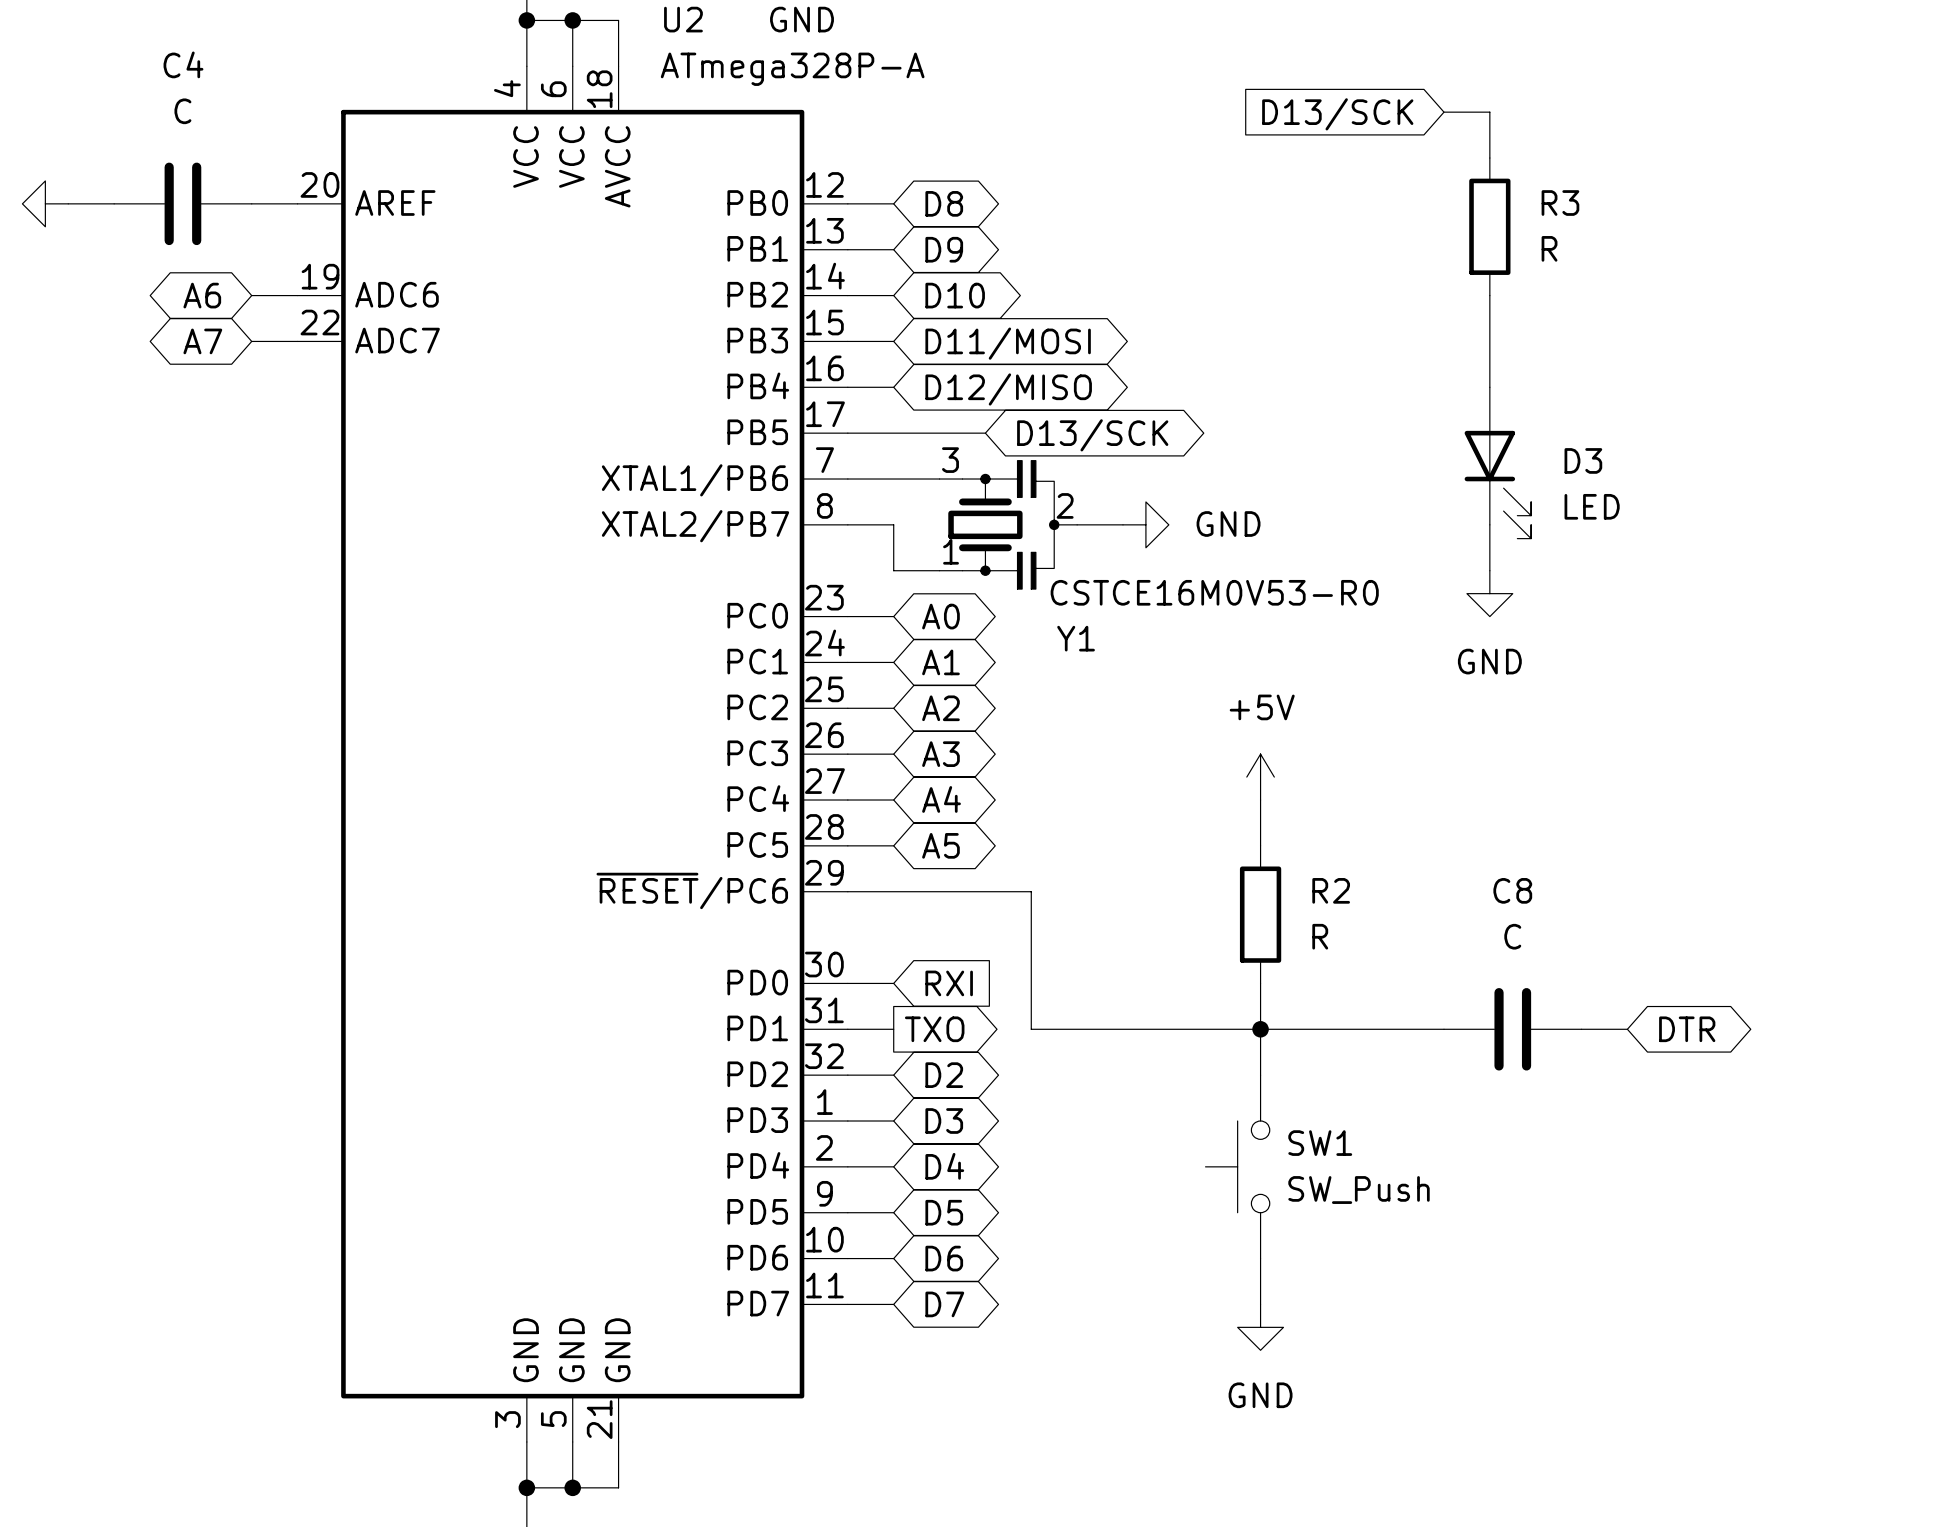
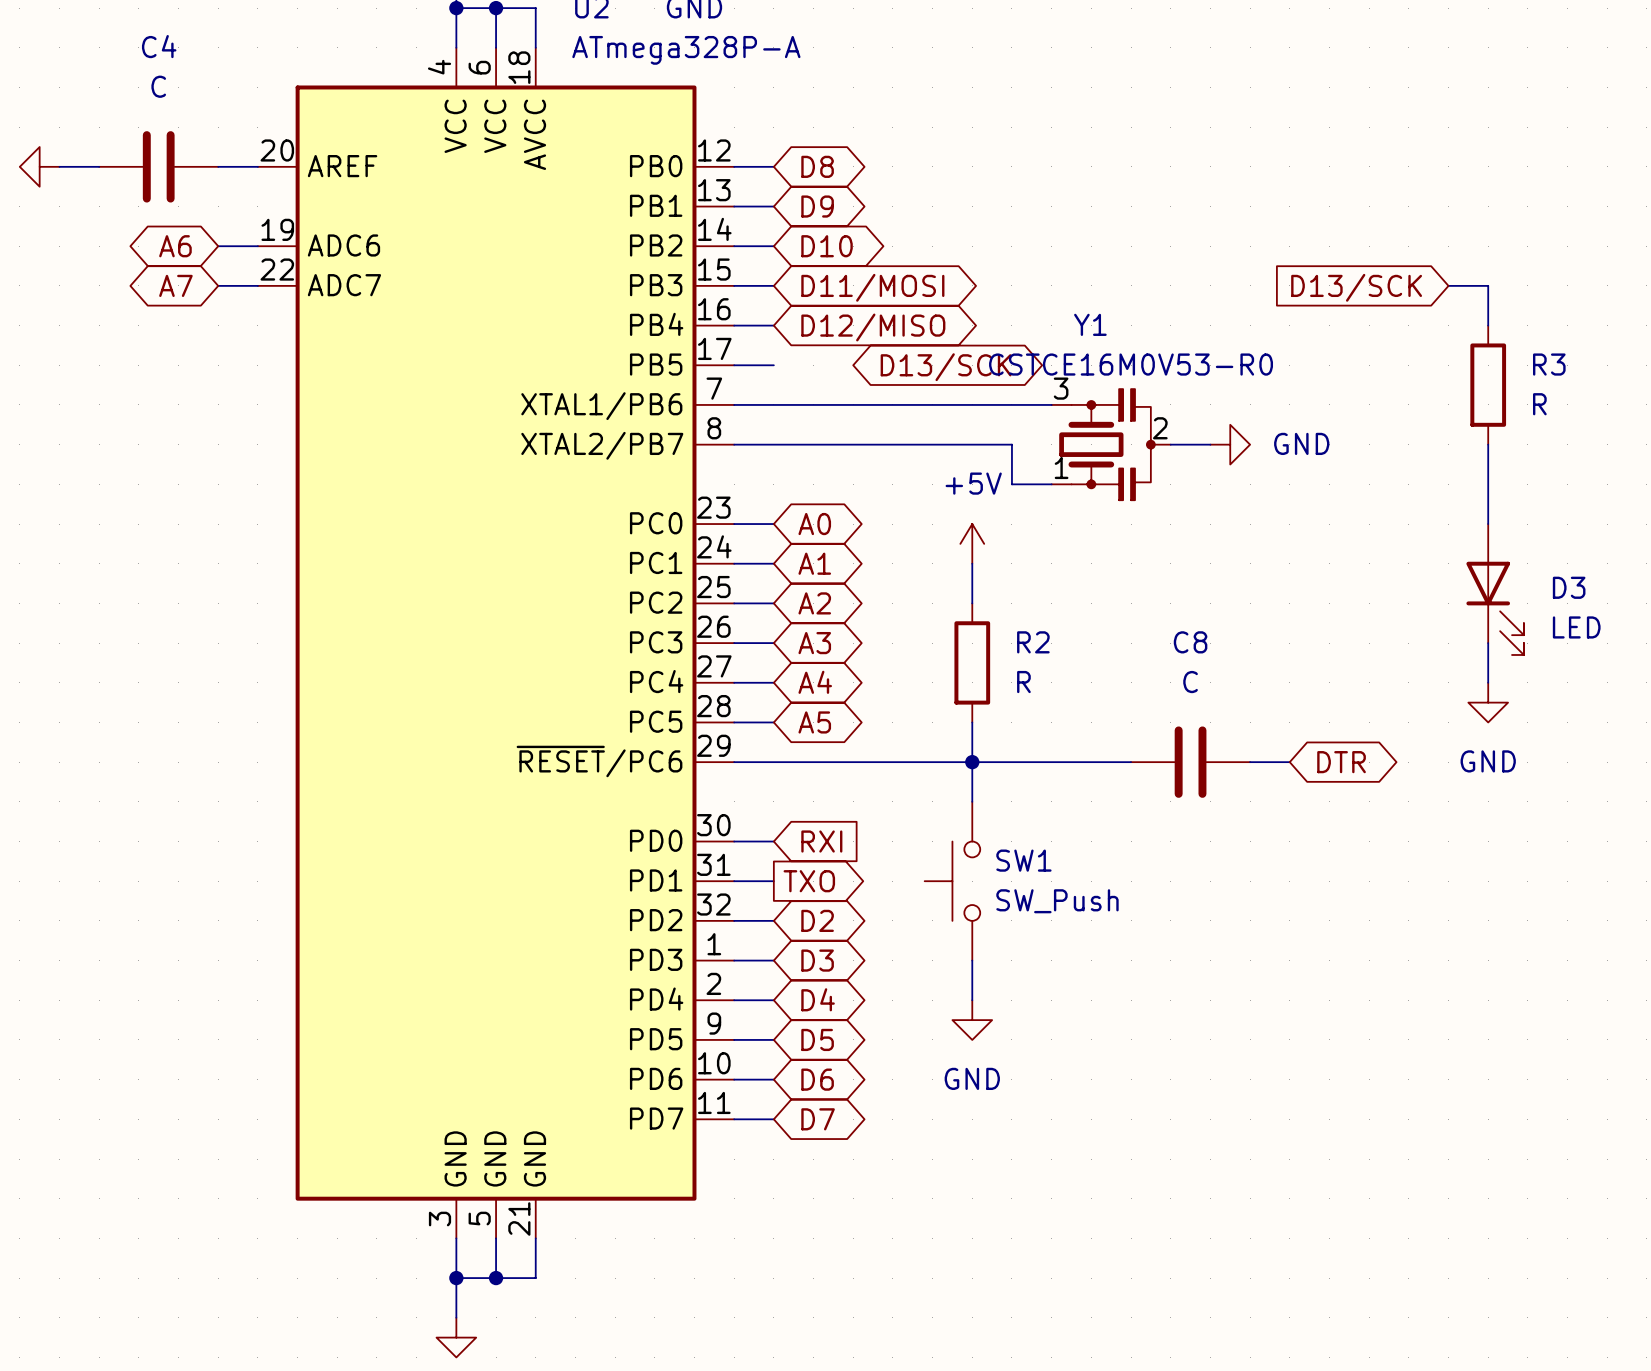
wire: (1443, 112) (1489, 112) (1489, 158) -> (1448, 285) (1488, 285) (1488, 325)
global label position: D13/SCK (1337, 114) -> D13/SCK (1356, 287)
R3 position: (1489, 226) -> (1488, 385)
wire: (1489, 295) (1489, 387) -> (1488, 444) (1488, 524)
wire: (893, 433) (985, 433) -> none
D3 position: (1497, 462) -> (1495, 589)
wire: none -> (813, 404) (1051, 404)
wire: (893, 524) (893, 570) (939, 570) -> (773, 444) (932, 444)
Y1 position: (1008, 524) -> (1111, 444)
wire: none -> (972, 444) (1011, 444) (1011, 484) (1051, 484)
power symbol: GND (1145, 524) -> none
wire: none -> (1170, 444) (1210, 444)
wire: (1489, 524) (1489, 570) -> (1488, 643) (1488, 682)
Y1 value position: CSTCE16M0V53-R0 (1214, 592) -> CSTCE16M0V53-R0 (1131, 364)
power symbol rotation: 0° (1489, 593) -> 90° counterclockwise (1230, 444)
power symbol position: GND (1489, 593) -> GND (1230, 444)
Y1 name position: Y1 (1076, 638) -> Y1 (1090, 324)
power symbol position: +5V (1260, 777) -> +5V (972, 543)
wire: (1260, 800) (1260, 845) -> (972, 563) (972, 603)
power symbol: none -> GND (1488, 702)
wire: (1031, 891) (1031, 1029) (1443, 1029) -> (892, 762) (1131, 762)
junction: none -> (972, 762)
R2 position: (1260, 914) -> (972, 662)
wire: (1260, 983) (1260, 1075) -> (972, 722) (972, 801)
junction: (1260, 1029) -> none
C8 position: (1512, 1029) -> (1190, 762)
wire: (1581, 1029) (1627, 1029) -> (1250, 762) (1289, 762)
global label position: DTR (1687, 1029) -> DTR (1341, 762)
SW1 position: (1237, 1166) -> (952, 881)
wire: (1260, 1258) (1260, 1304) -> (972, 960) (972, 1000)
power symbol position: GND (1260, 1327) -> GND (972, 1020)

